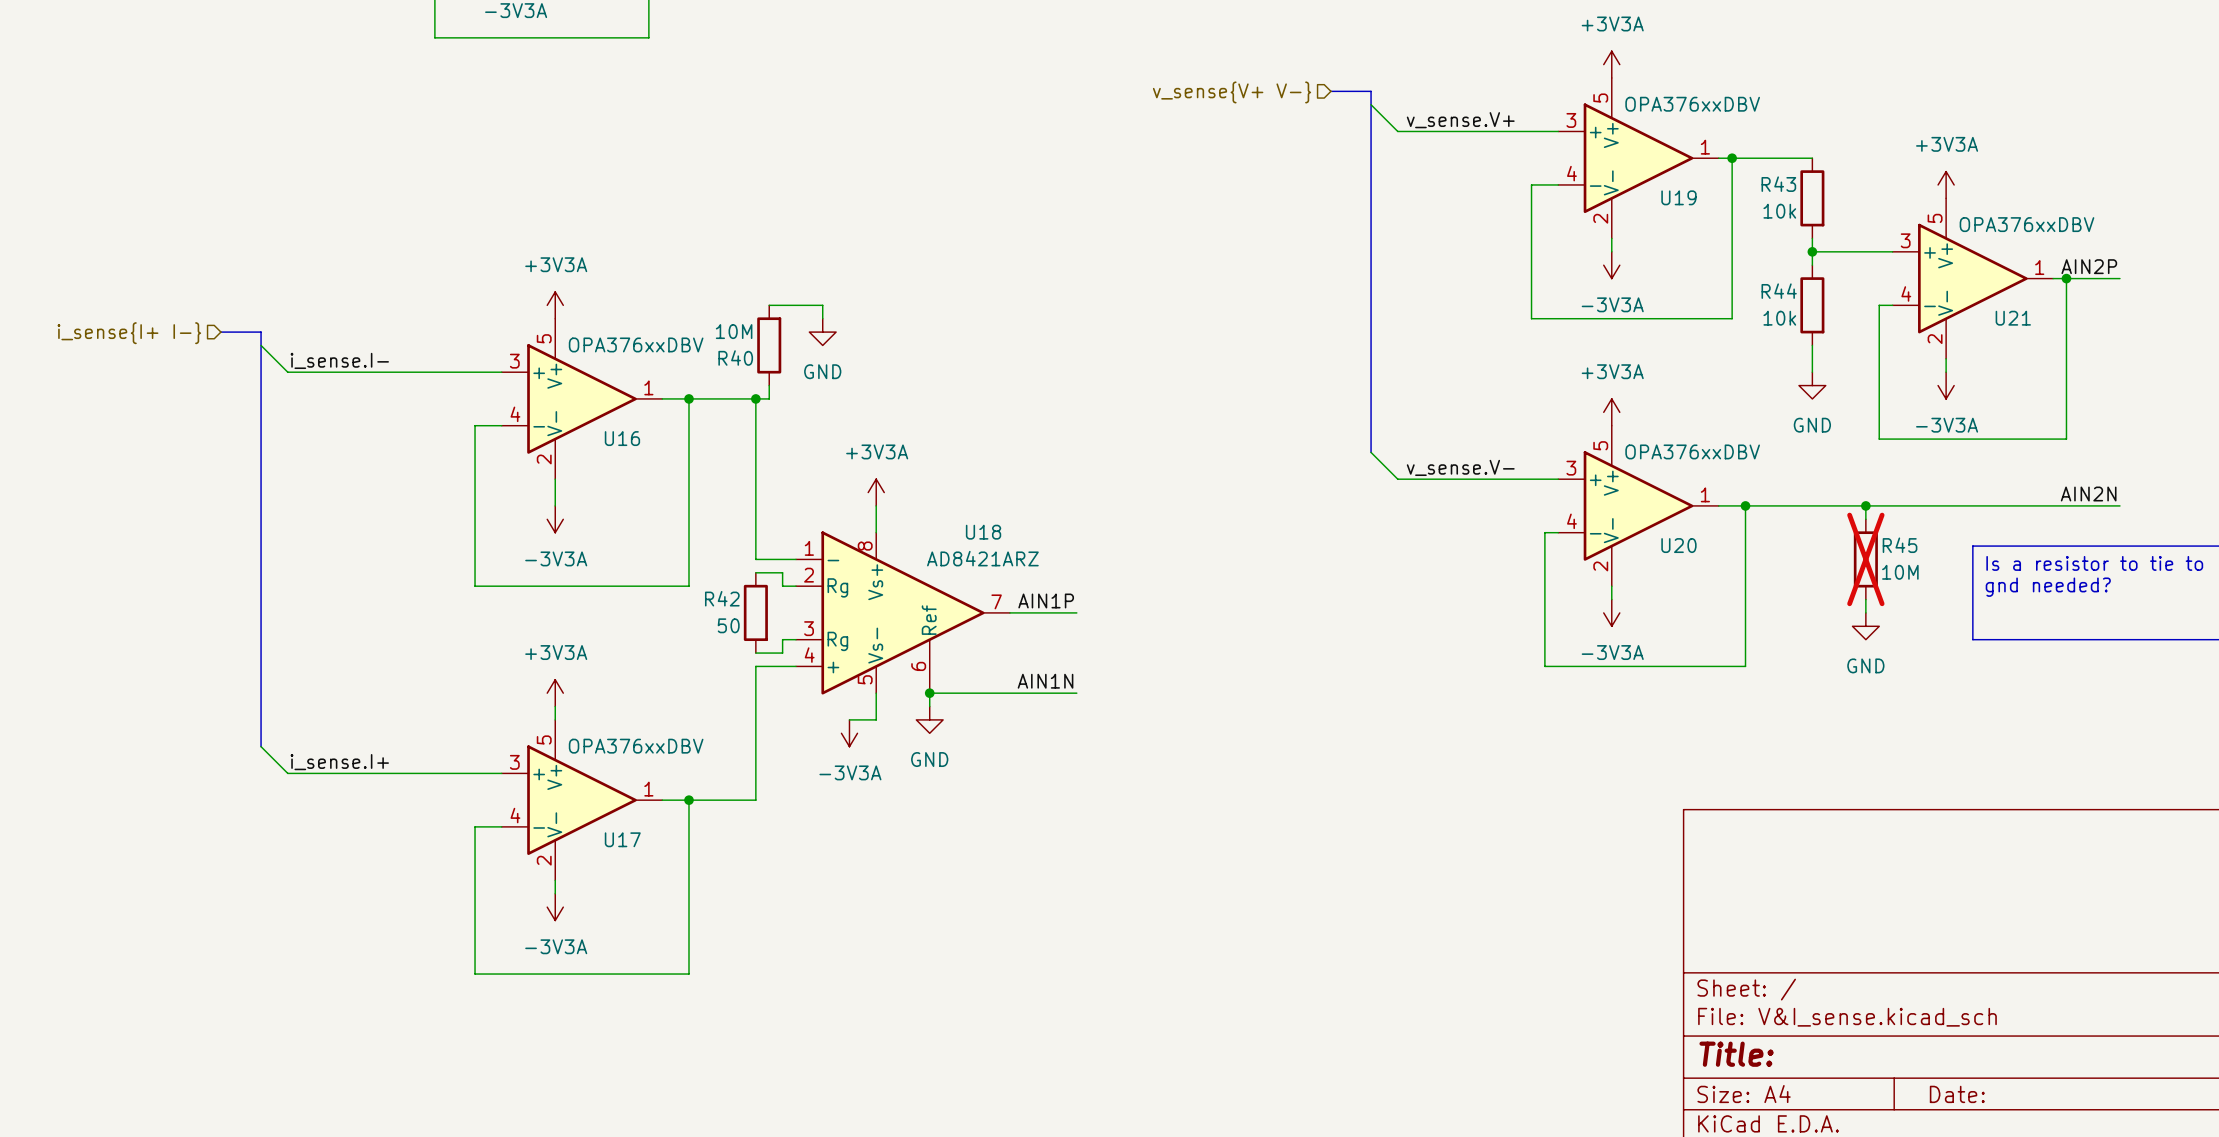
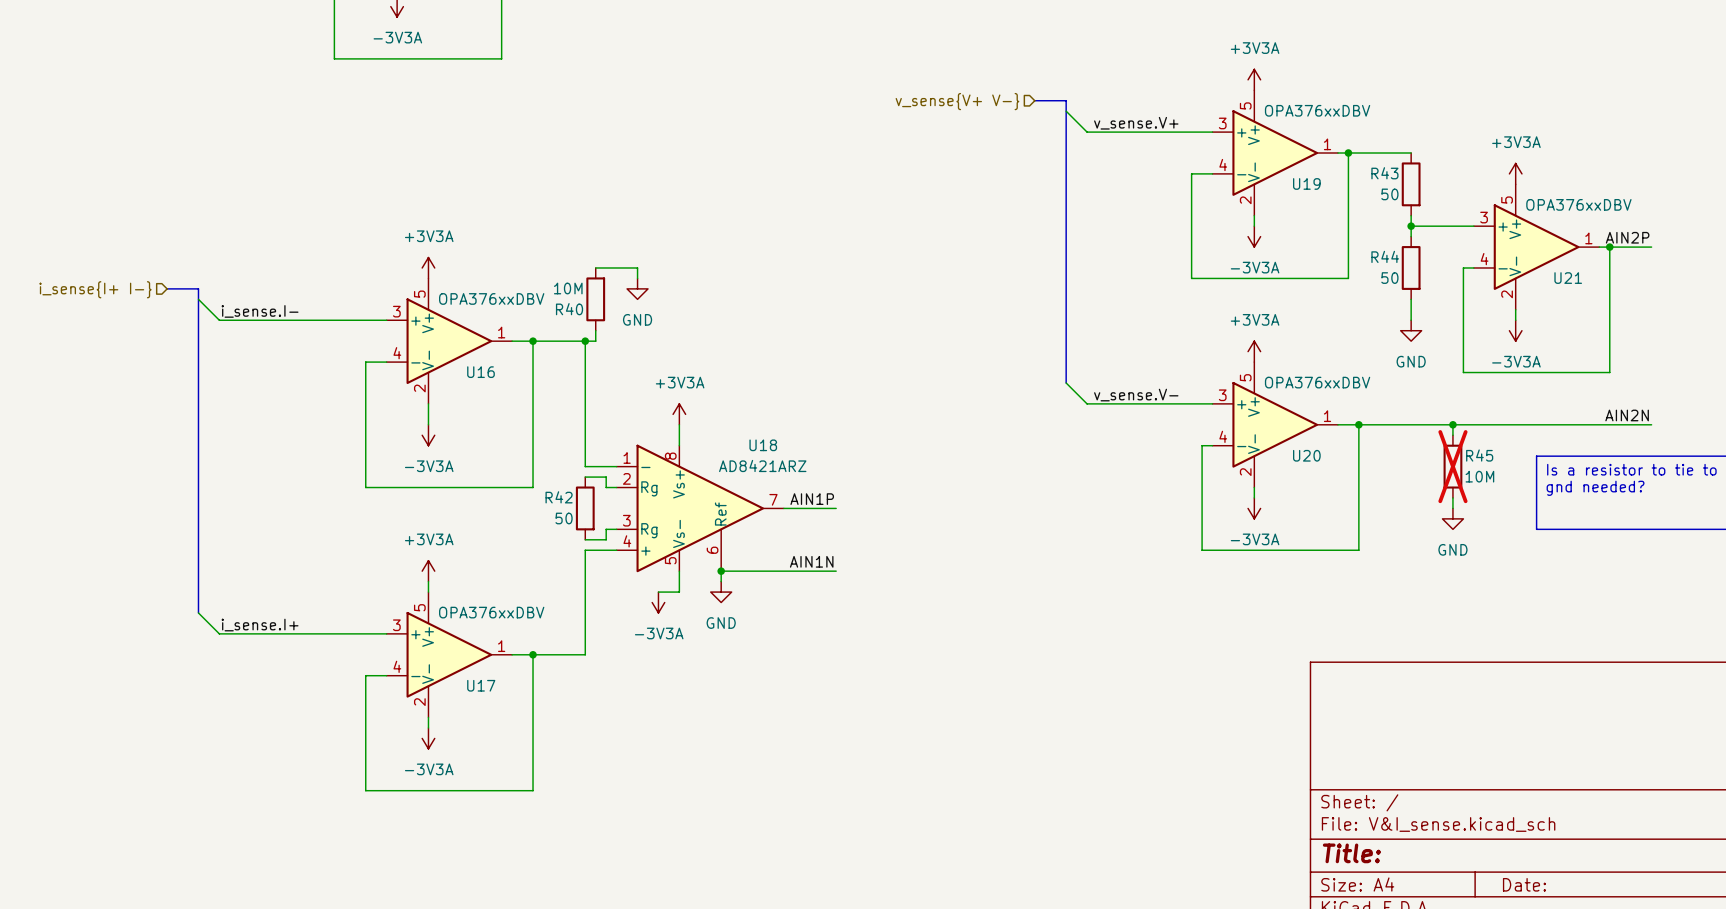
R43 value: 10k (1779, 211) -> 50 (1389, 194)
R44 value: 10k (1779, 318) -> 50 (1389, 278)

